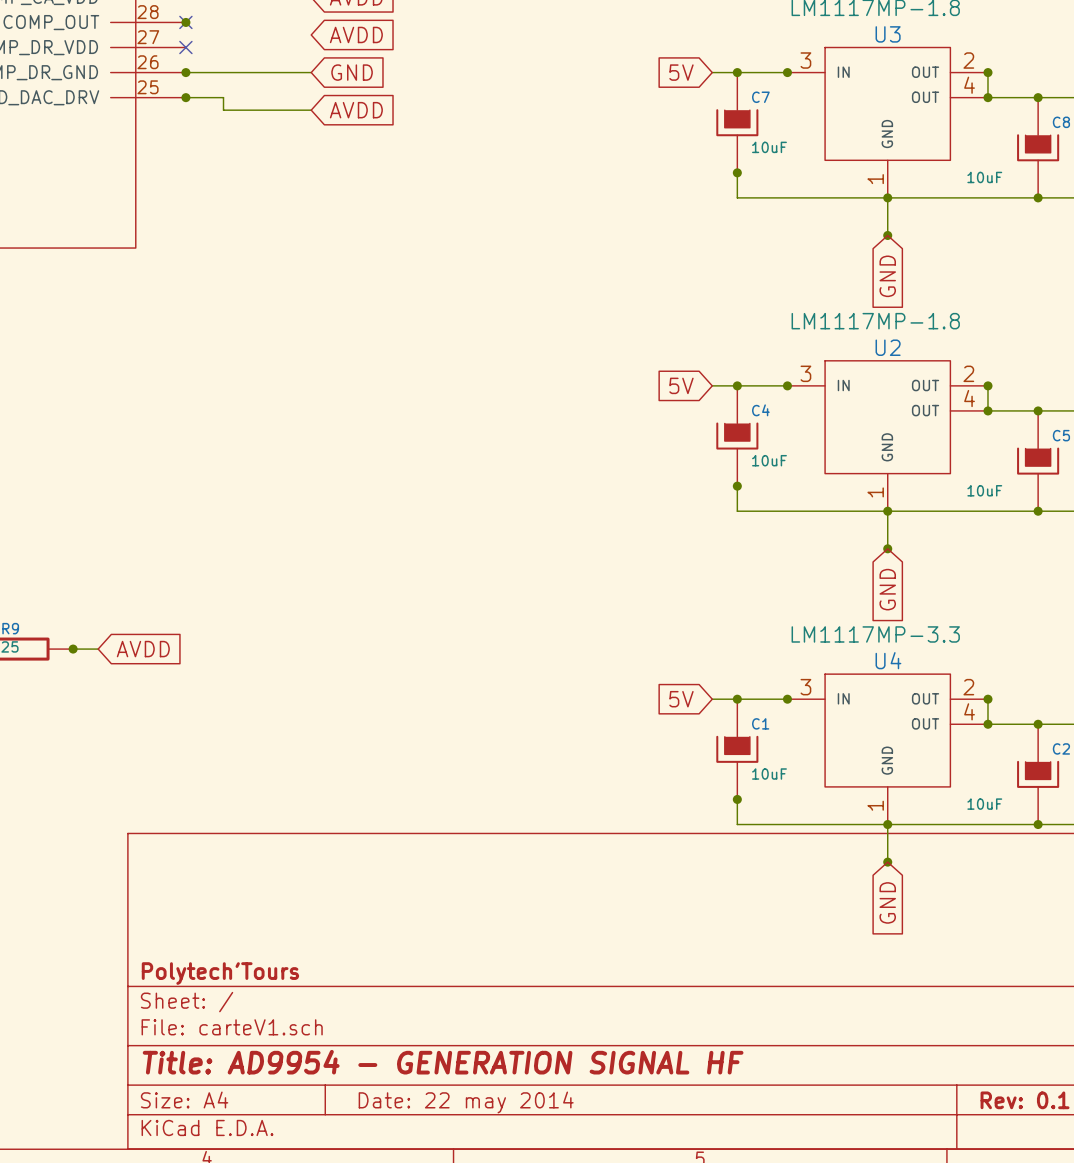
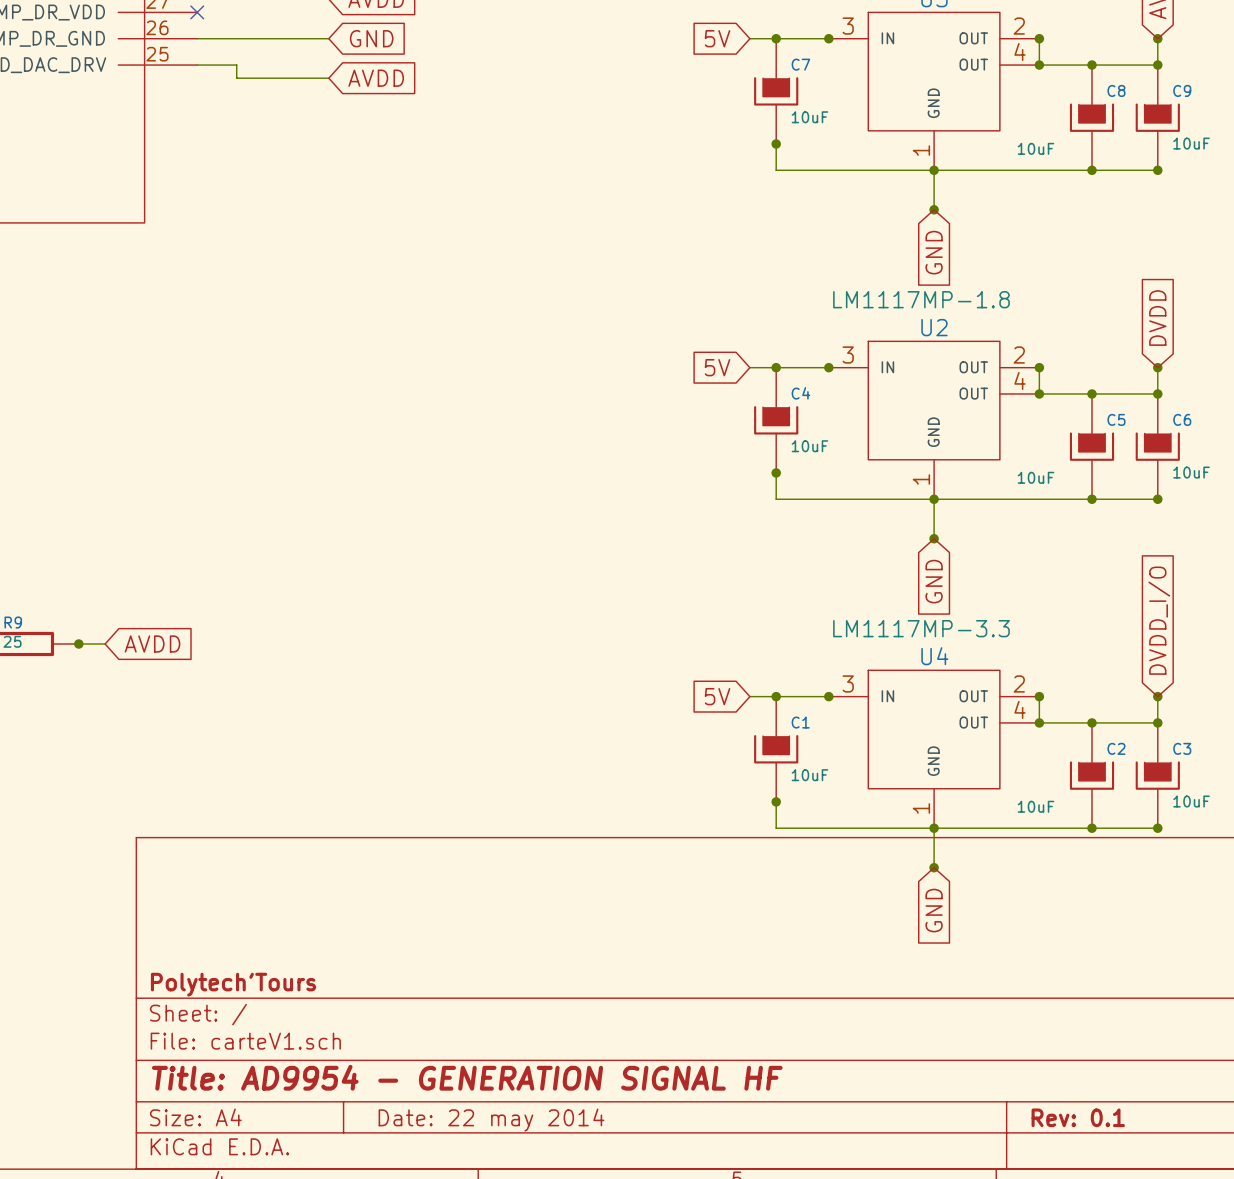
junction: (185, 72) -> none
junction: (185, 97) -> none

